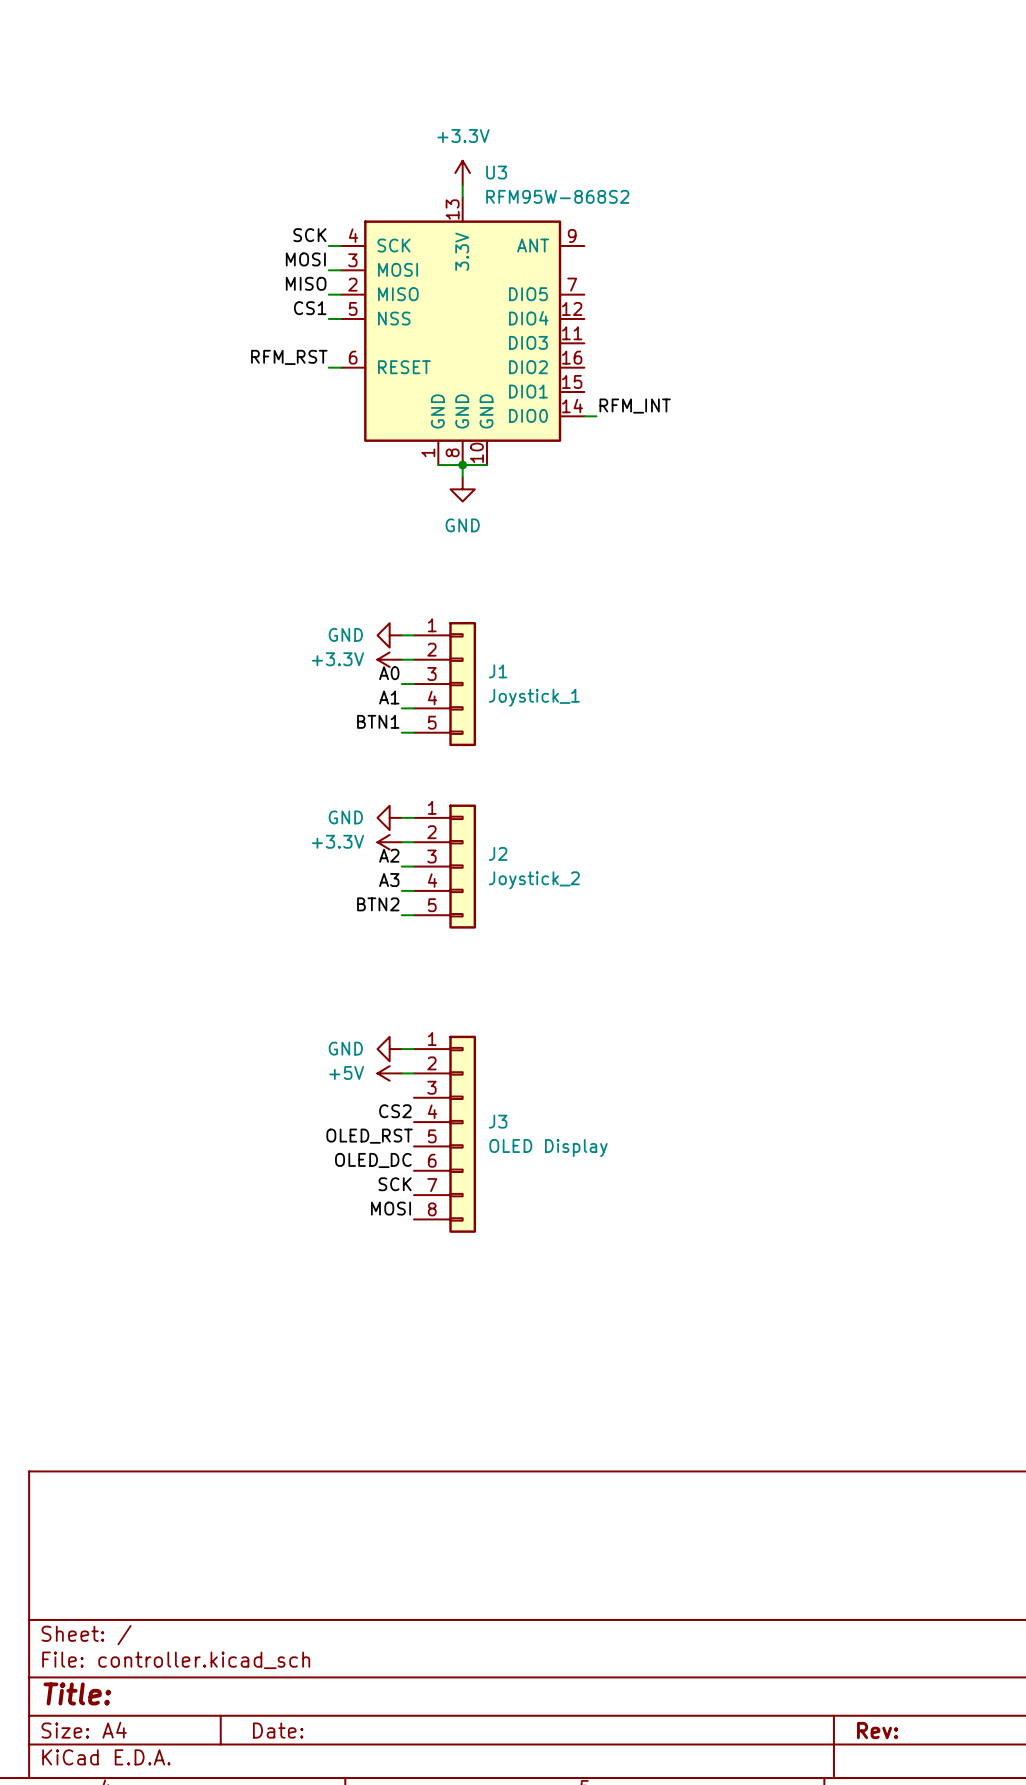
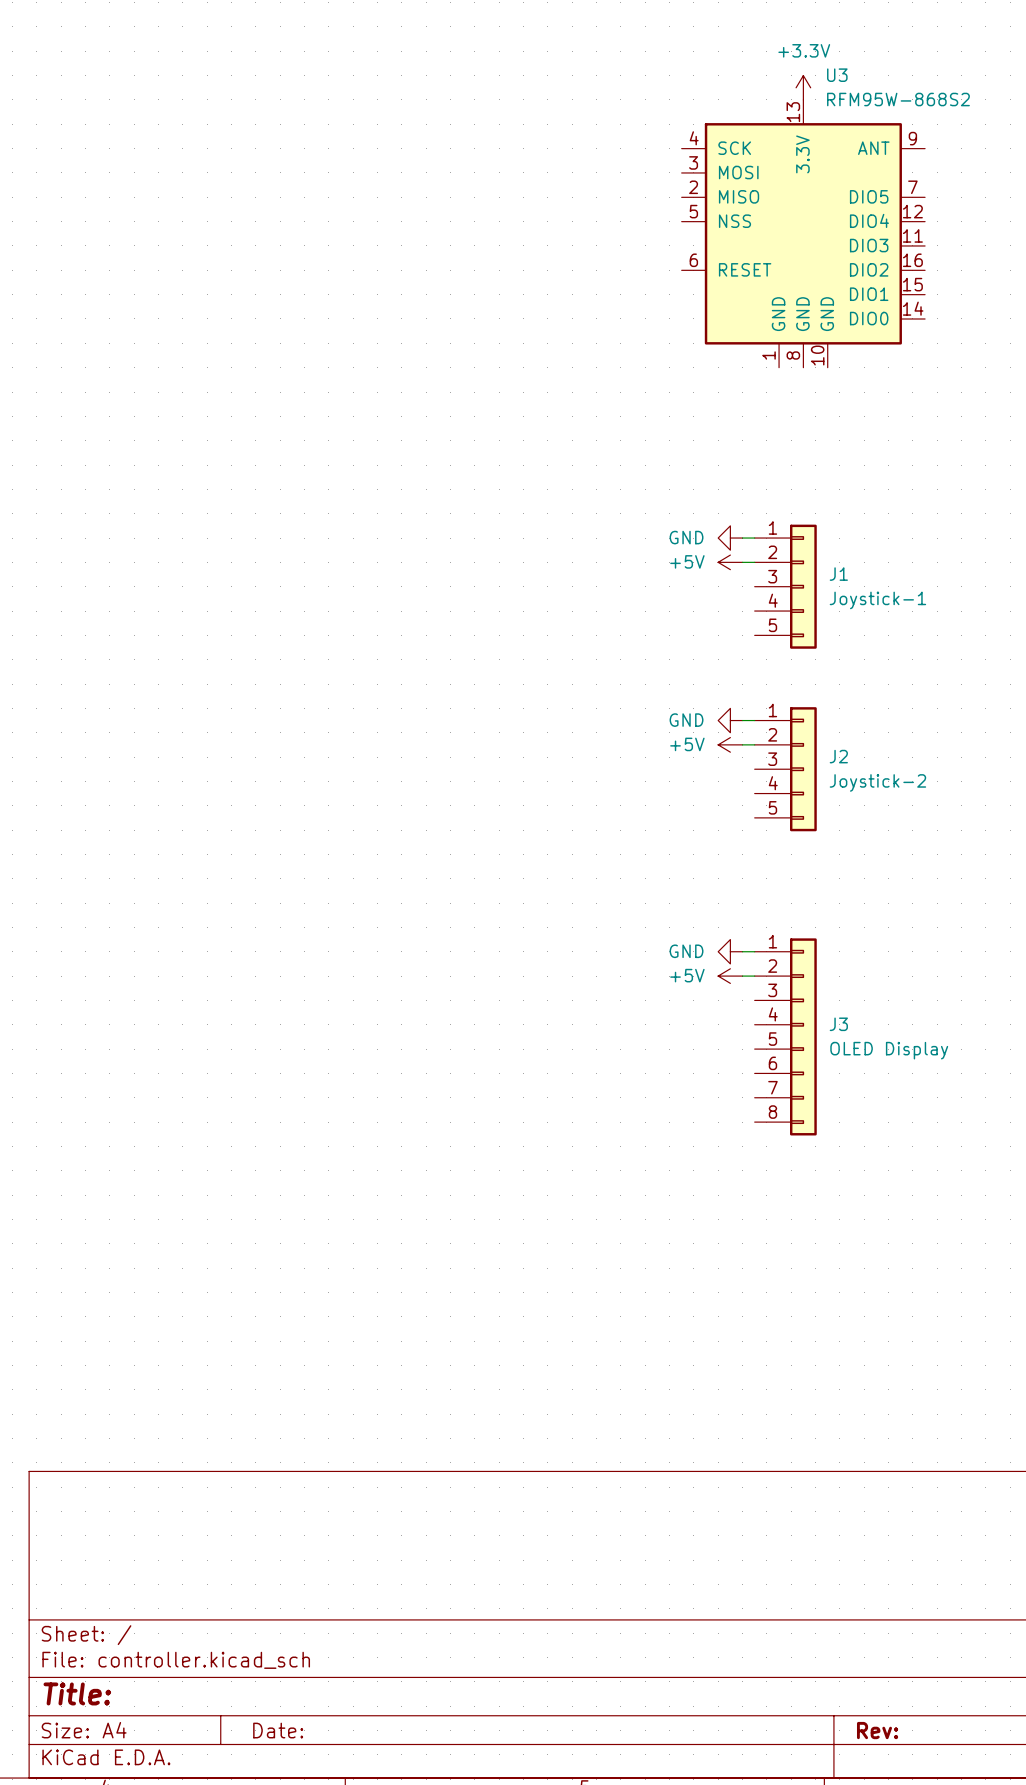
power symbol: none -> +3.3V (803, 87)
power symbol: +3.3V (462, 172) -> none
wire: (462, 185) (462, 197) -> none
label: SCK (309, 235) -> none
wire: (328, 245) (340, 245) -> none
label: MOSI (305, 259) -> none
wire: (328, 270) (340, 270) -> none
label: MISO (306, 283) -> none
wire: (328, 294) (340, 294) -> none
label: CS1 (310, 308) -> none
wire: (328, 318) (340, 318) -> none
U3 position: (462, 331) -> (803, 233)
label: RFM_RST (289, 357) -> none
wire: (328, 367) (340, 367) -> none
label: RFM_INT (635, 406) -> none
wire: (584, 416) (596, 416) -> (742, 538) (754, 538)
wire: (438, 465) (487, 465) -> none
wire: (462, 465) (462, 477) -> none
junction: (462, 465) -> none
power symbol: GND (462, 489) -> none
power symbol: none -> GND (730, 538)
power symbol: none -> +5V (730, 562)
wire: none -> (742, 562) (754, 562)
power symbol: GND (389, 635) -> none
wire: (401, 635) (414, 635) -> none
power symbol: +3.3V (389, 659) -> none
wire: (401, 659) (414, 659) -> none
label: A0 (389, 673) -> none
wire: (401, 684) (414, 684) -> none
J1 position: (445, 684) -> (785, 586)
label: A1 (389, 697) -> none
J1 value: Joystick_1 (534, 697) -> Joystick-1 (877, 600)
wire: (401, 708) (414, 708) -> none
power symbol: none -> GND (730, 720)
wire: none -> (742, 720) (754, 720)
label: BTN1 (378, 721) -> none
wire: (401, 732) (414, 732) -> none
power symbol: none -> +5V (730, 744)
wire: none -> (742, 744) (754, 744)
power symbol: GND (389, 817) -> none
wire: (401, 817) (414, 817) -> none
power symbol: +3.3V (389, 842) -> none
wire: (401, 842) (414, 842) -> none
label: A2 (389, 855) -> none
wire: (401, 866) (414, 866) -> none
J2 position: (445, 866) -> (785, 769)
label: A3 (389, 880) -> none
J2 value: Joystick_2 (534, 880) -> Joystick-2 (877, 782)
wire: (401, 890) (414, 890) -> none
label: BTN2 (378, 904) -> none
wire: (401, 915) (414, 915) -> none
power symbol: none -> GND (730, 951)
wire: none -> (742, 951) (754, 951)
power symbol: none -> +5V (730, 976)
wire: none -> (742, 976) (754, 976)
power symbol: GND (389, 1049) -> none
wire: (401, 1049) (414, 1049) -> none
power symbol: +5V (389, 1073) -> none
wire: (401, 1073) (414, 1073) -> none
label: CS2 (395, 1111) -> none
J3 position: (445, 1134) -> (785, 1036)
label: OLED_RST (369, 1136) -> none
label: OLED_DC (373, 1160) -> none
label: SCK (395, 1184) -> none
label: MOSI (391, 1208) -> none

